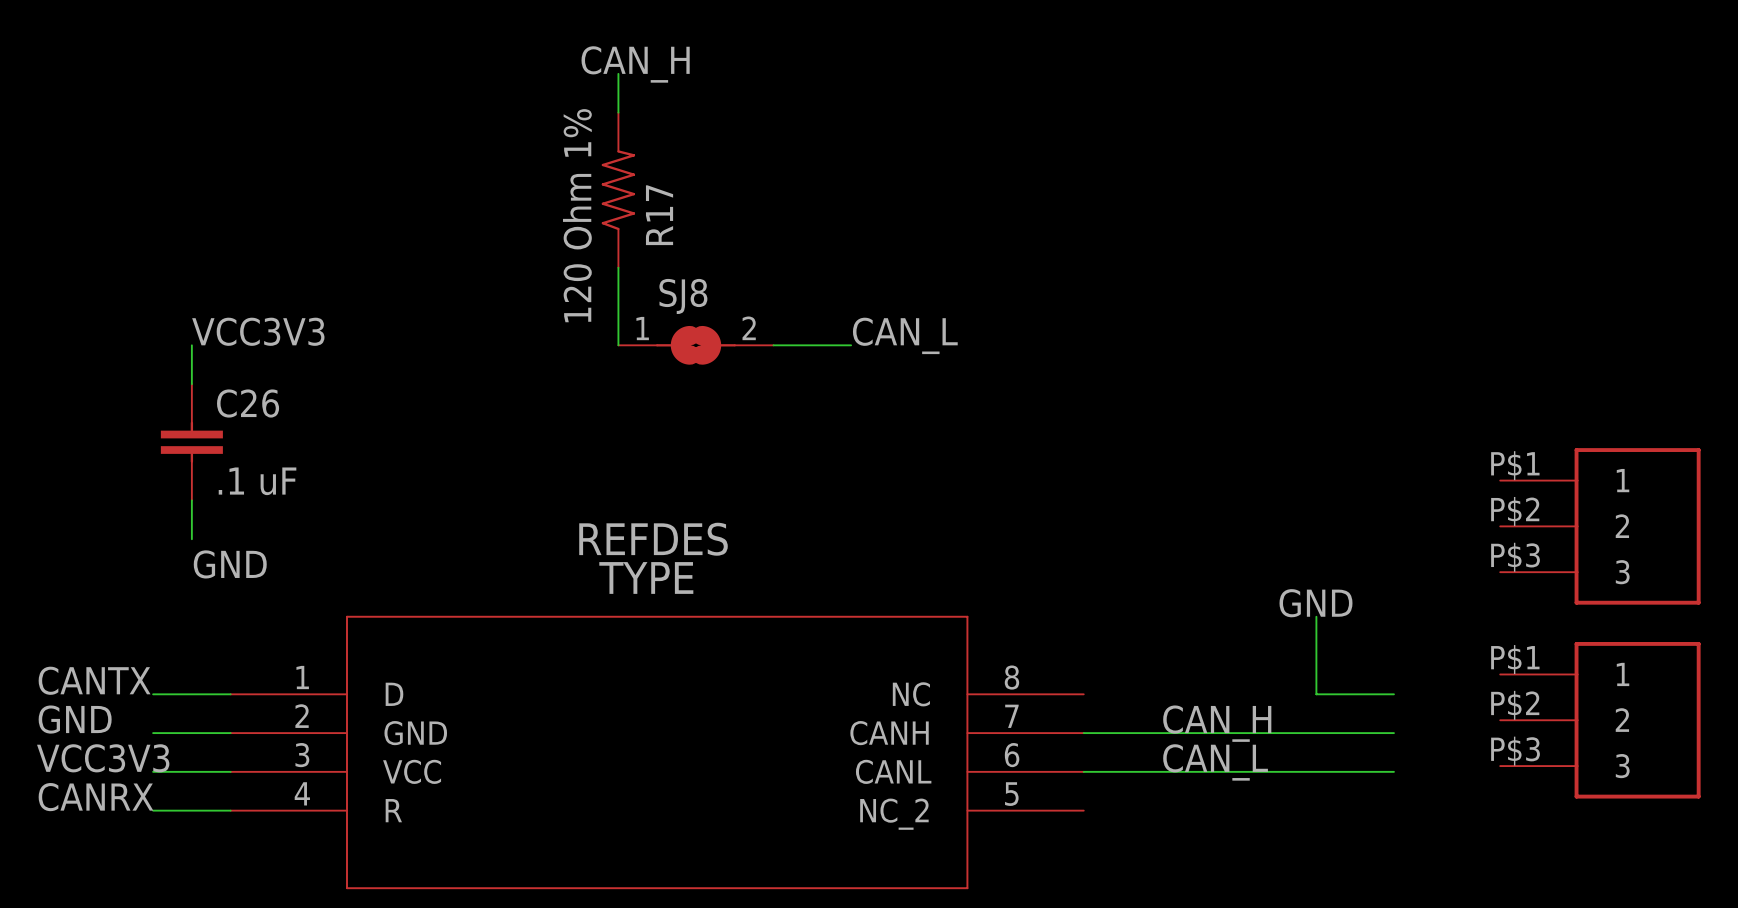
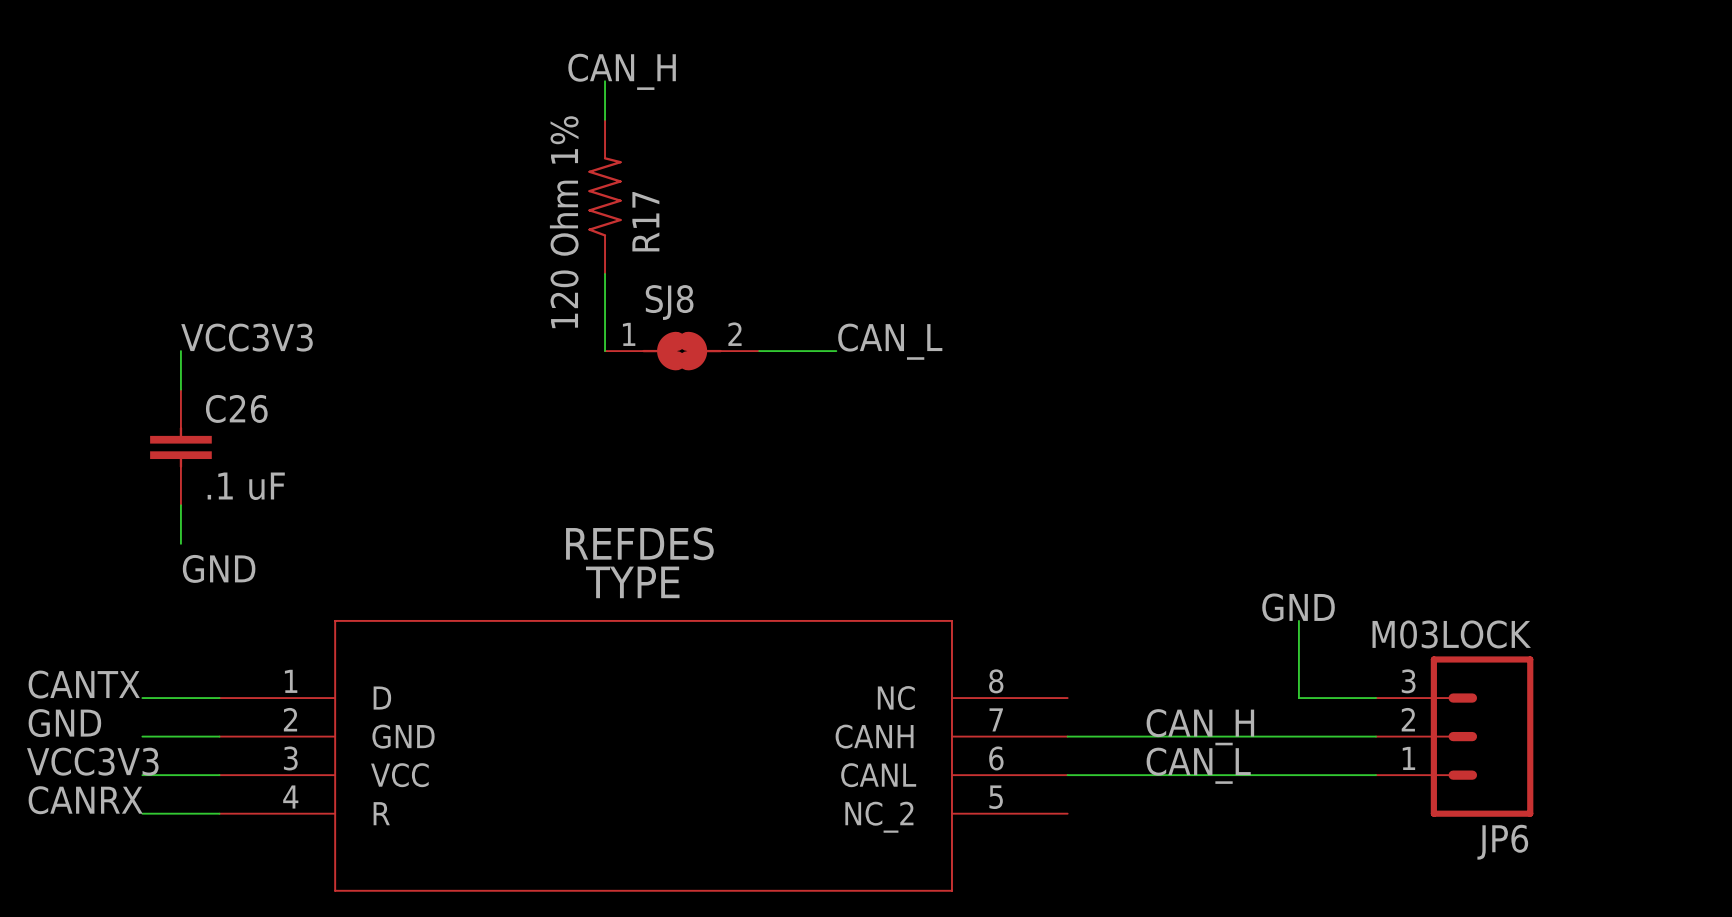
part: (1600, 526) -> none
part: (1600, 720) -> none
JP6: none -> M03LOCK (1454, 736)

